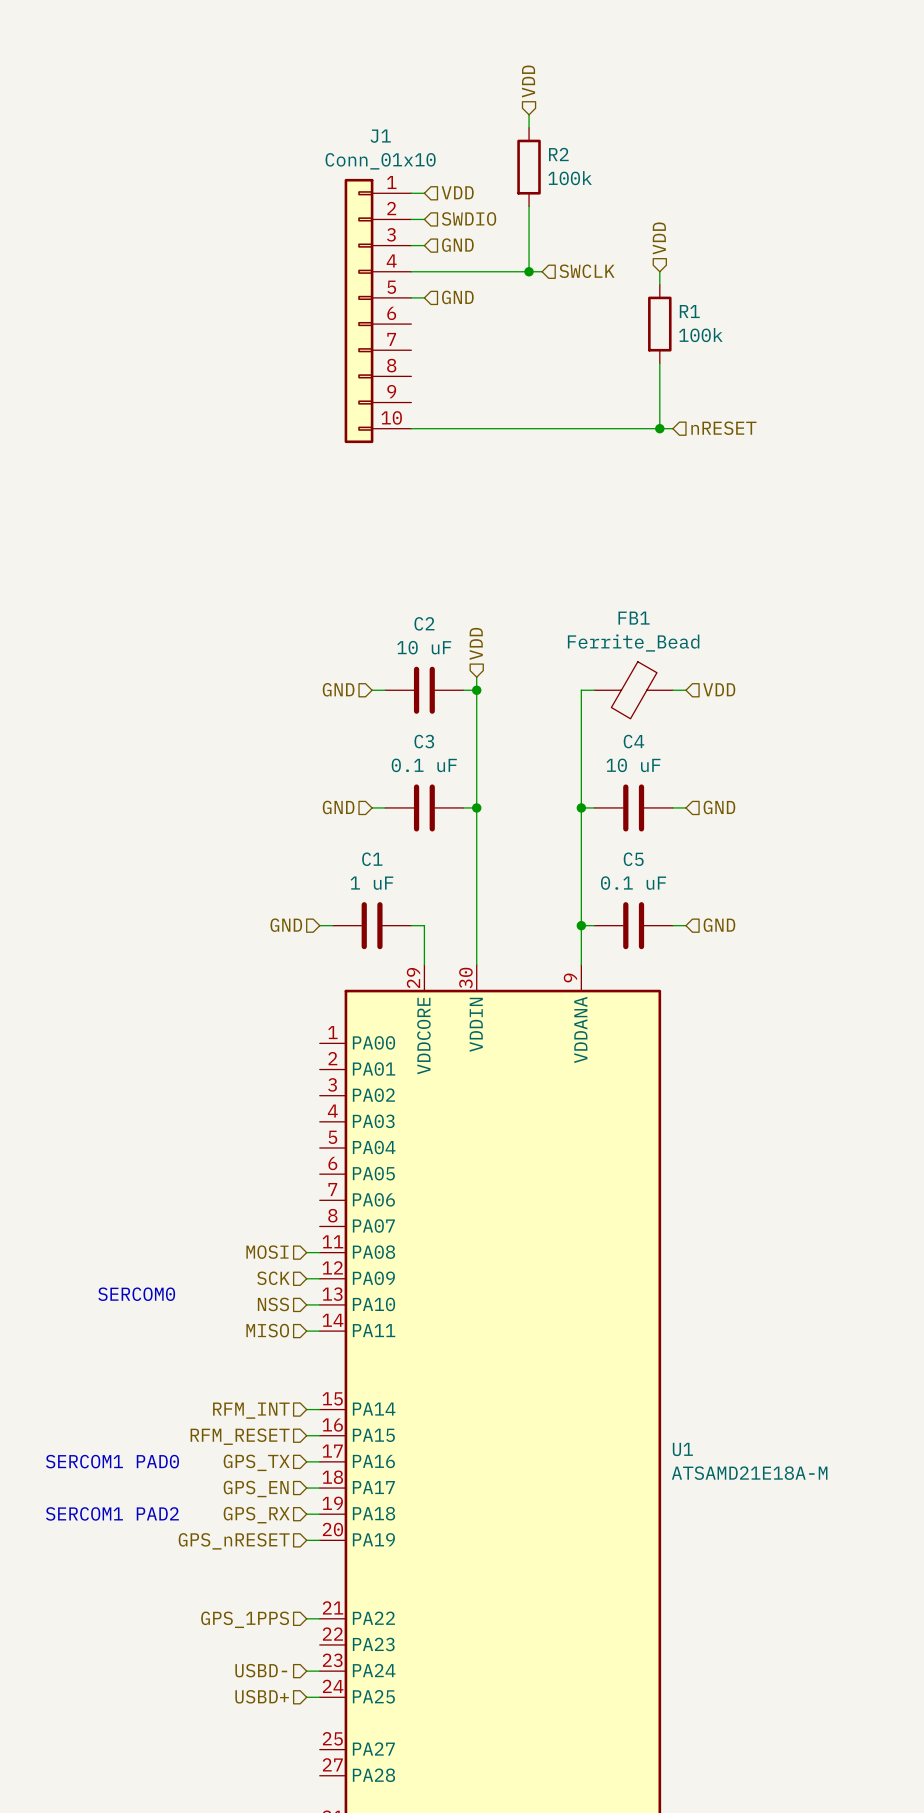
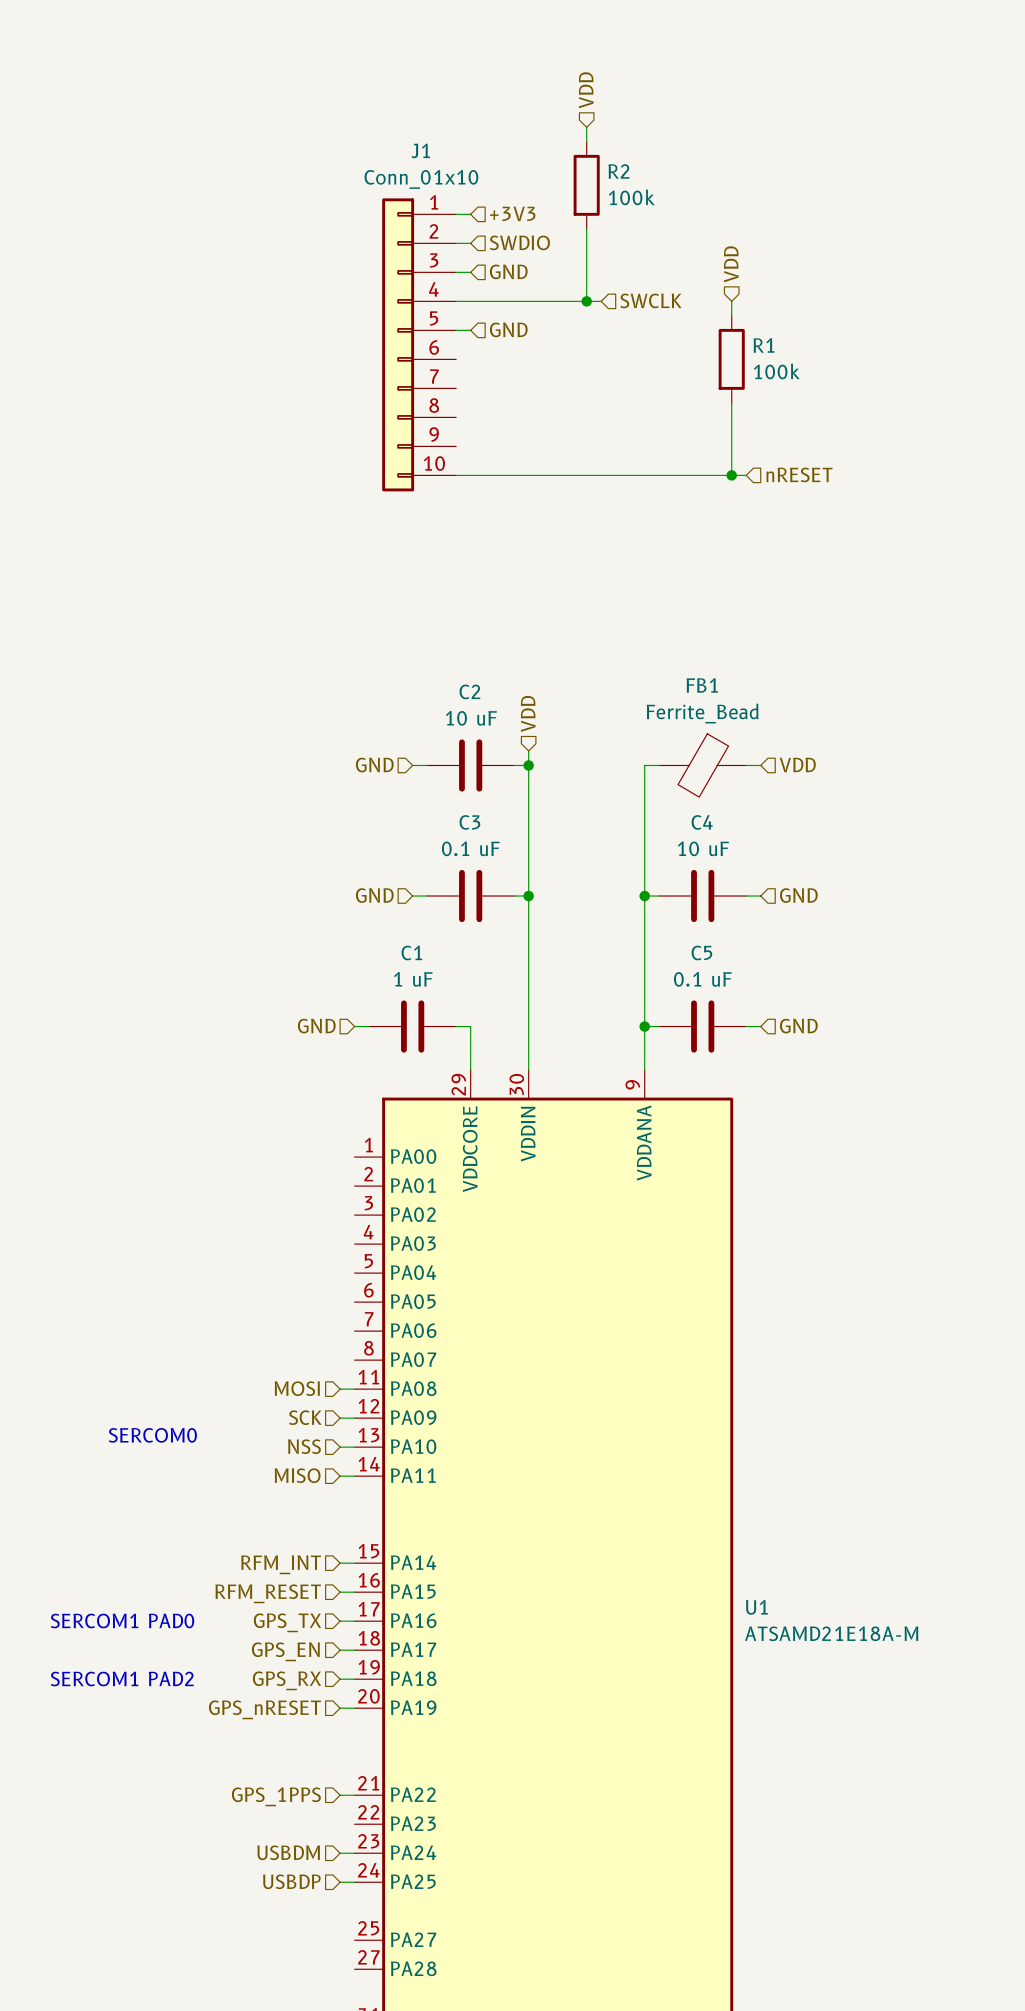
hierarchical label: VDD (457, 192) -> +3V3 (512, 213)
hierarchical label: USBD- (261, 1670) -> USBDM (288, 1852)
hierarchical label: USBD+ (262, 1696) -> USBDP (291, 1881)

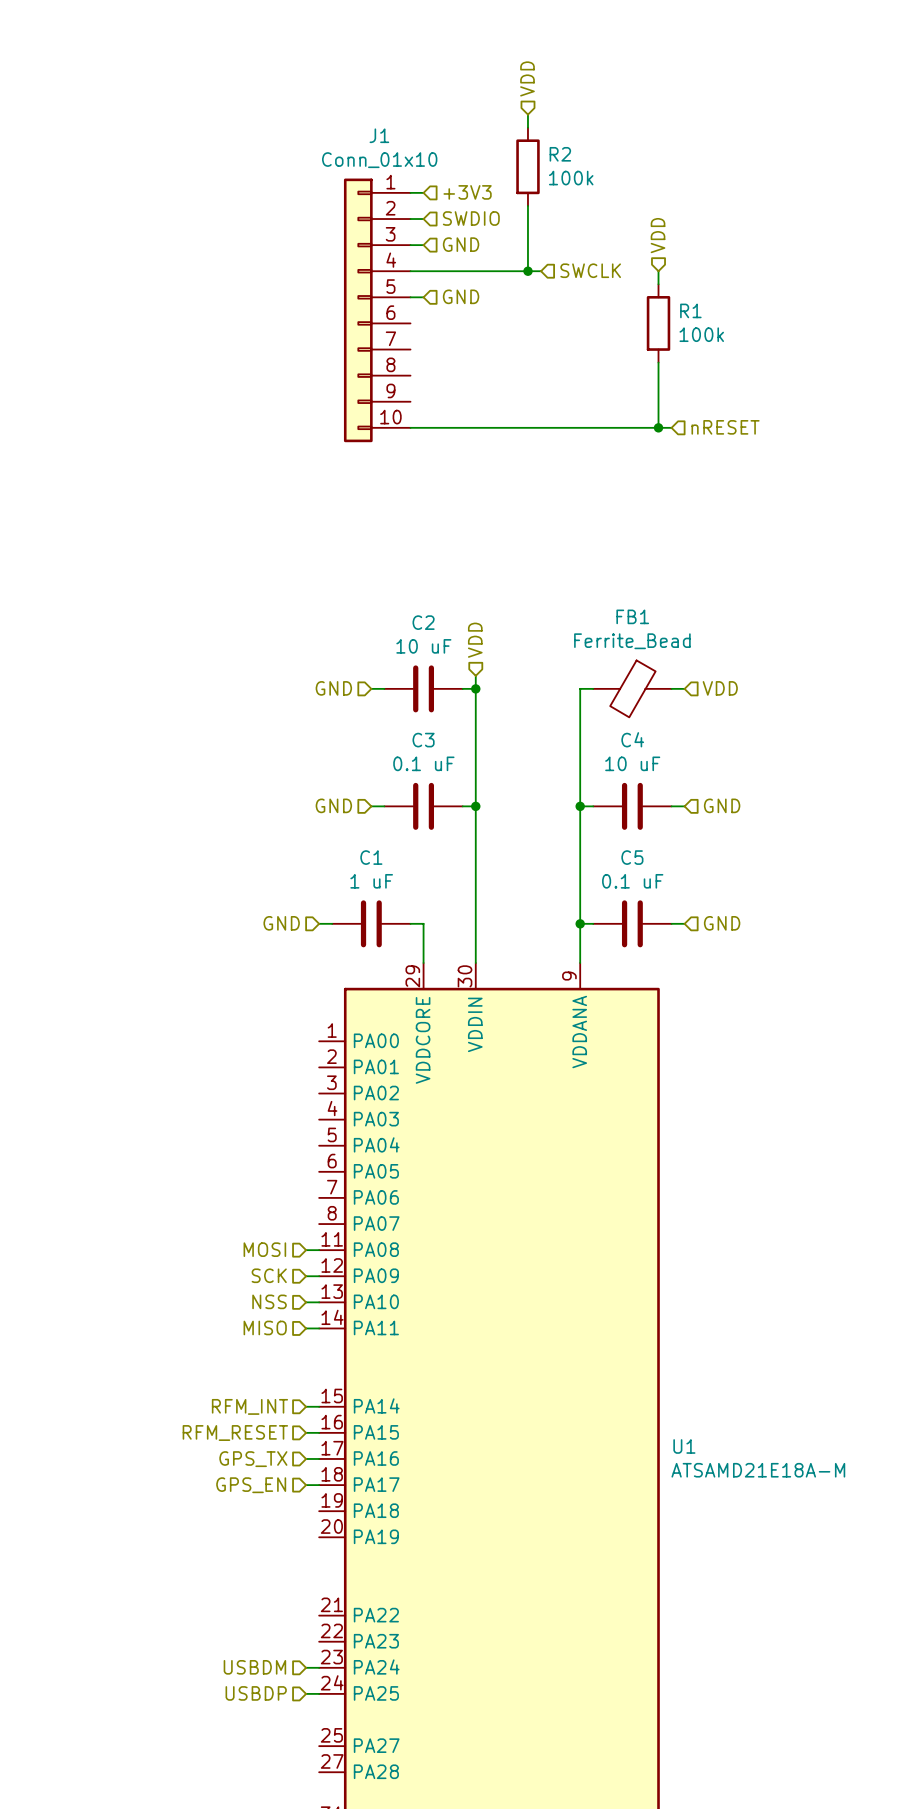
text: SERCOM0 (152, 1435) -> none
text: SERCOM1 PAD0 (122, 1620) -> none
text: SERCOM1 PAD2 (122, 1678) -> none
wire: (340, 1679) (354, 1679) -> none
hierarchical label: GPS_RX (286, 1680) -> none
wire: (340, 1708) (354, 1708) -> none
hierarchical label: GPS_nRESET (264, 1709) -> none
wire: (340, 1795) (354, 1795) -> none
hierarchical label: GPS_1PPS (276, 1796) -> none

